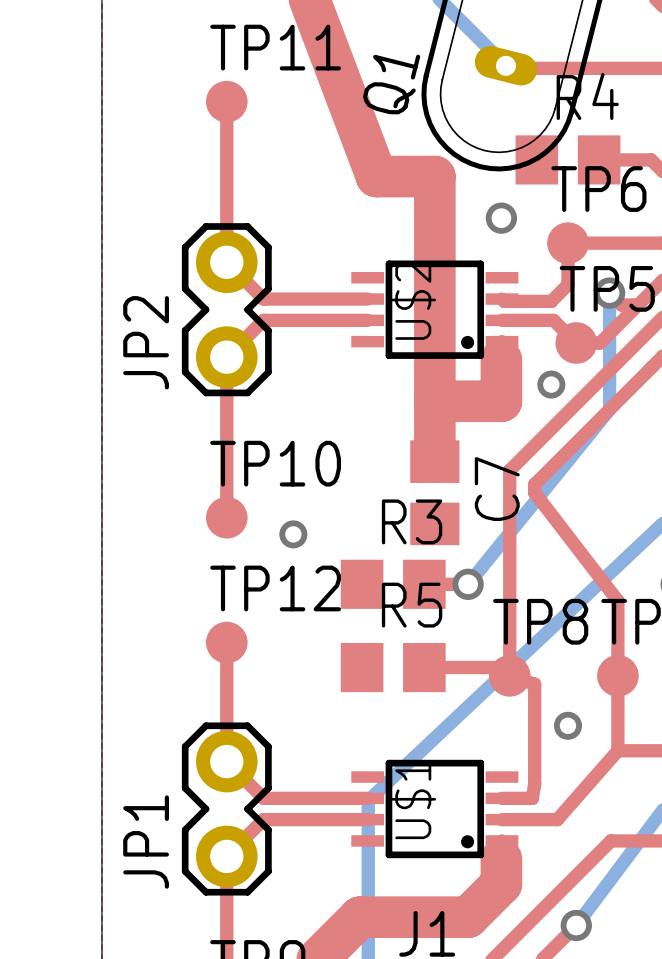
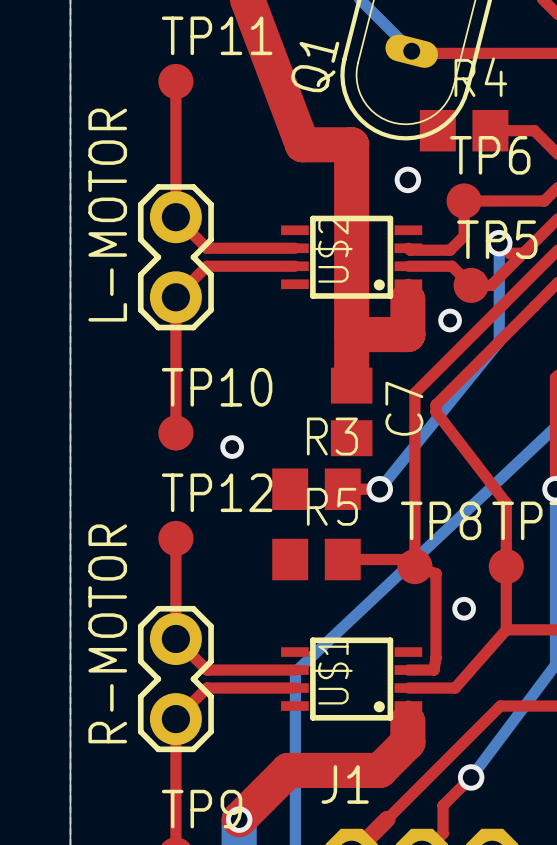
JP2 name: JP2 (146, 342) -> L-MOTOR (107, 215)
JP1 name: JP1 (146, 842) -> R-MOTOR (107, 633)

